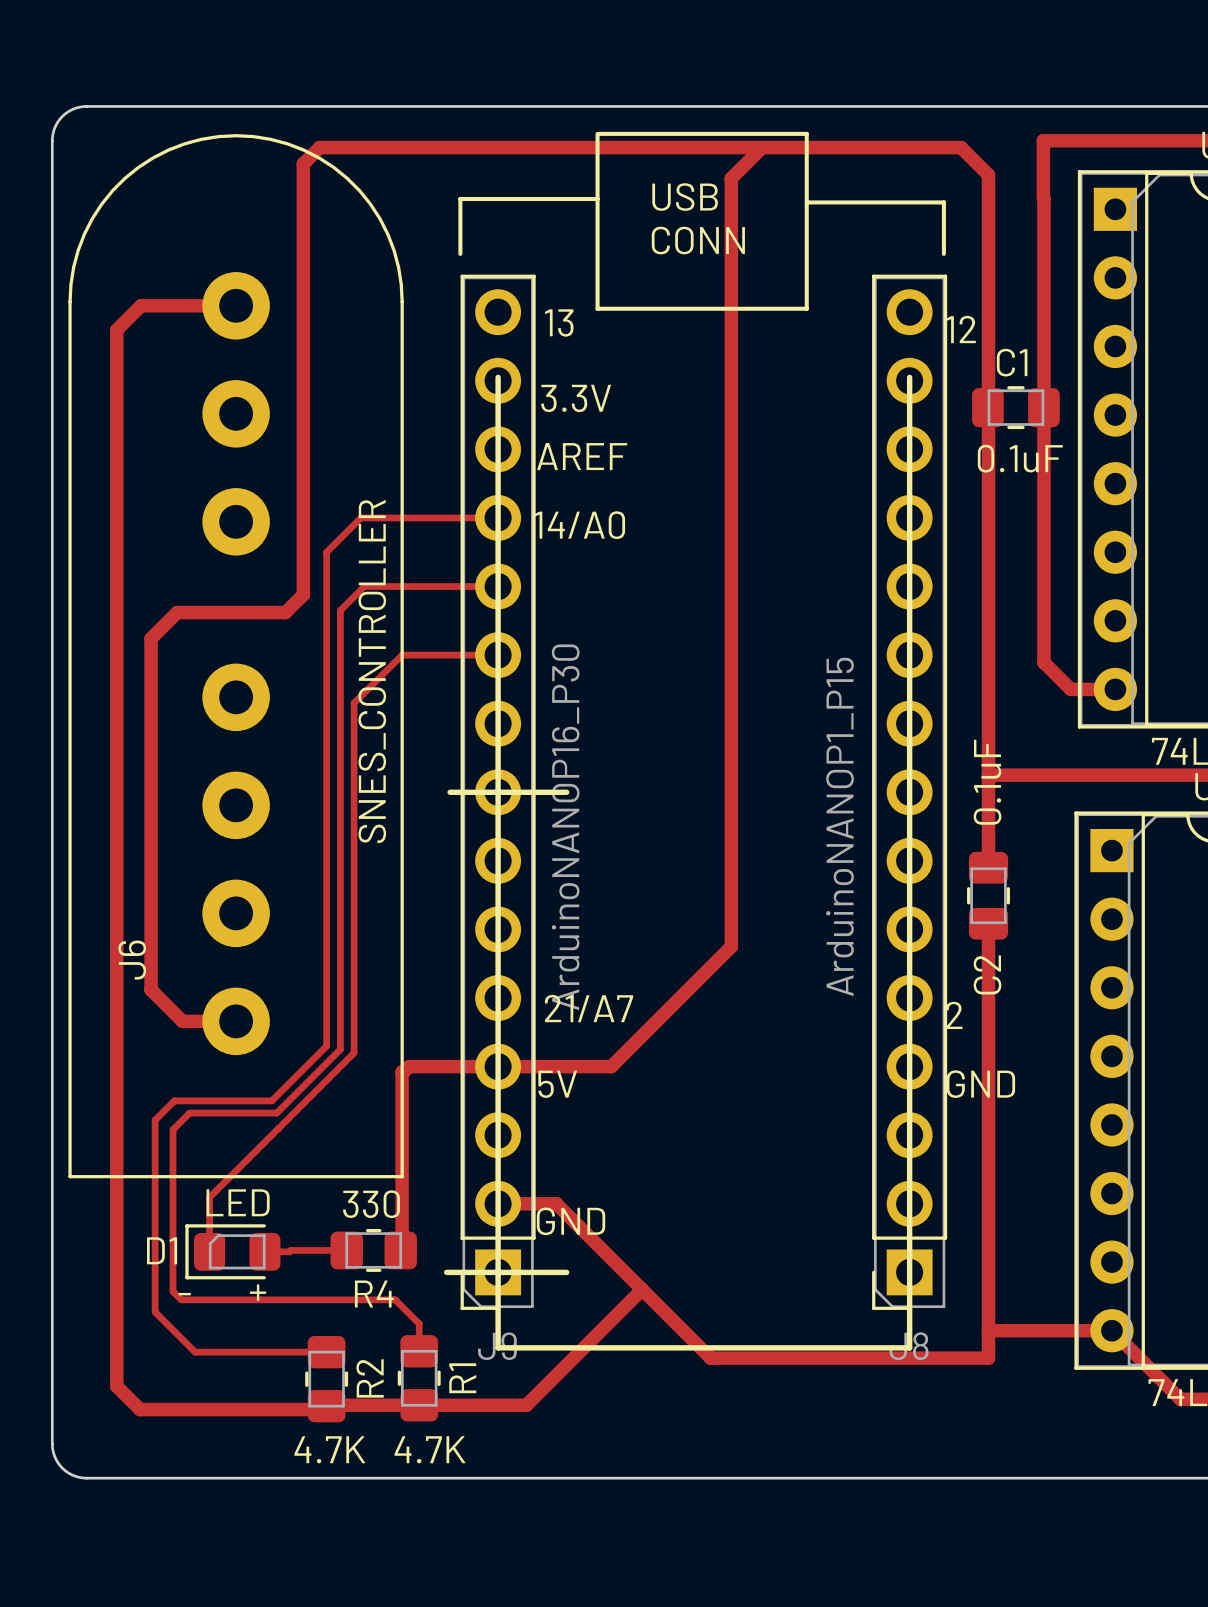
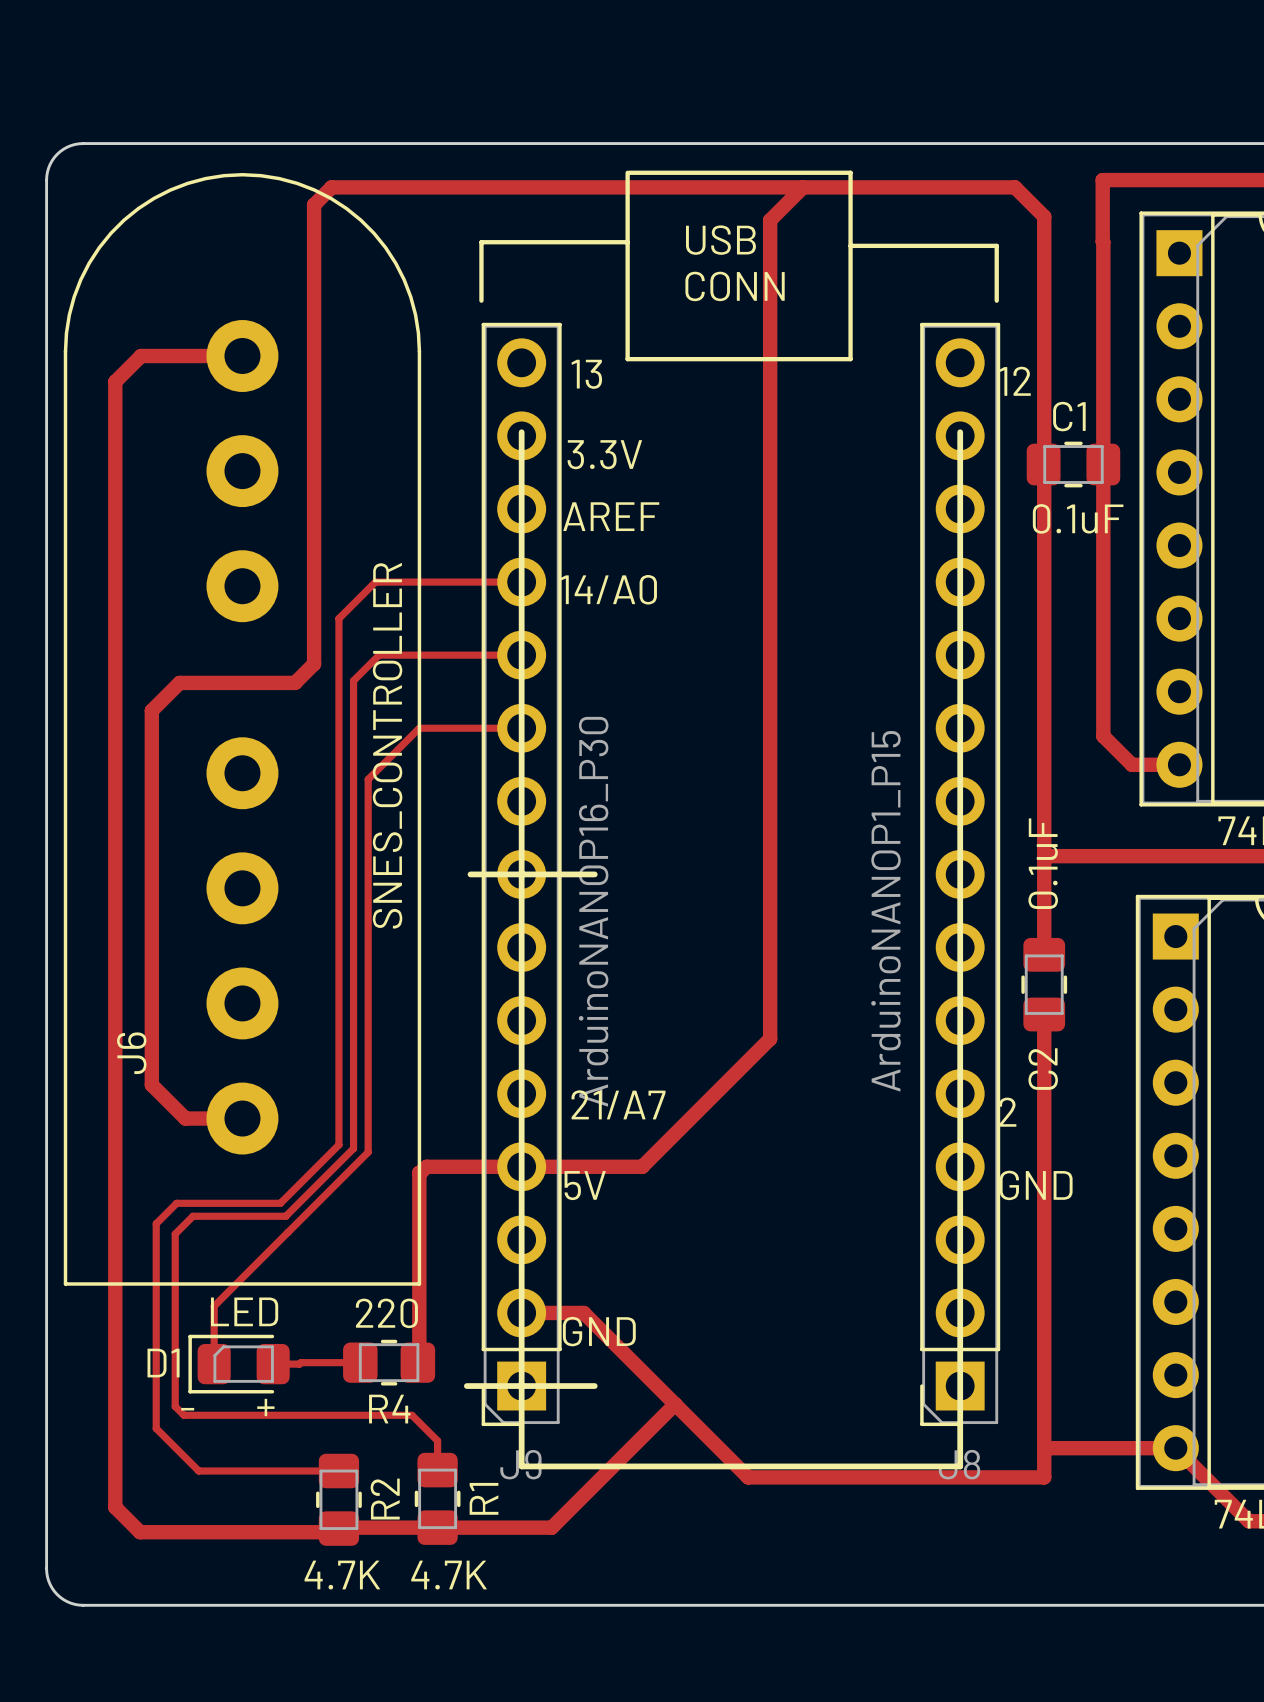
R4 value: 330 (371, 1204) -> 220 (386, 1313)

